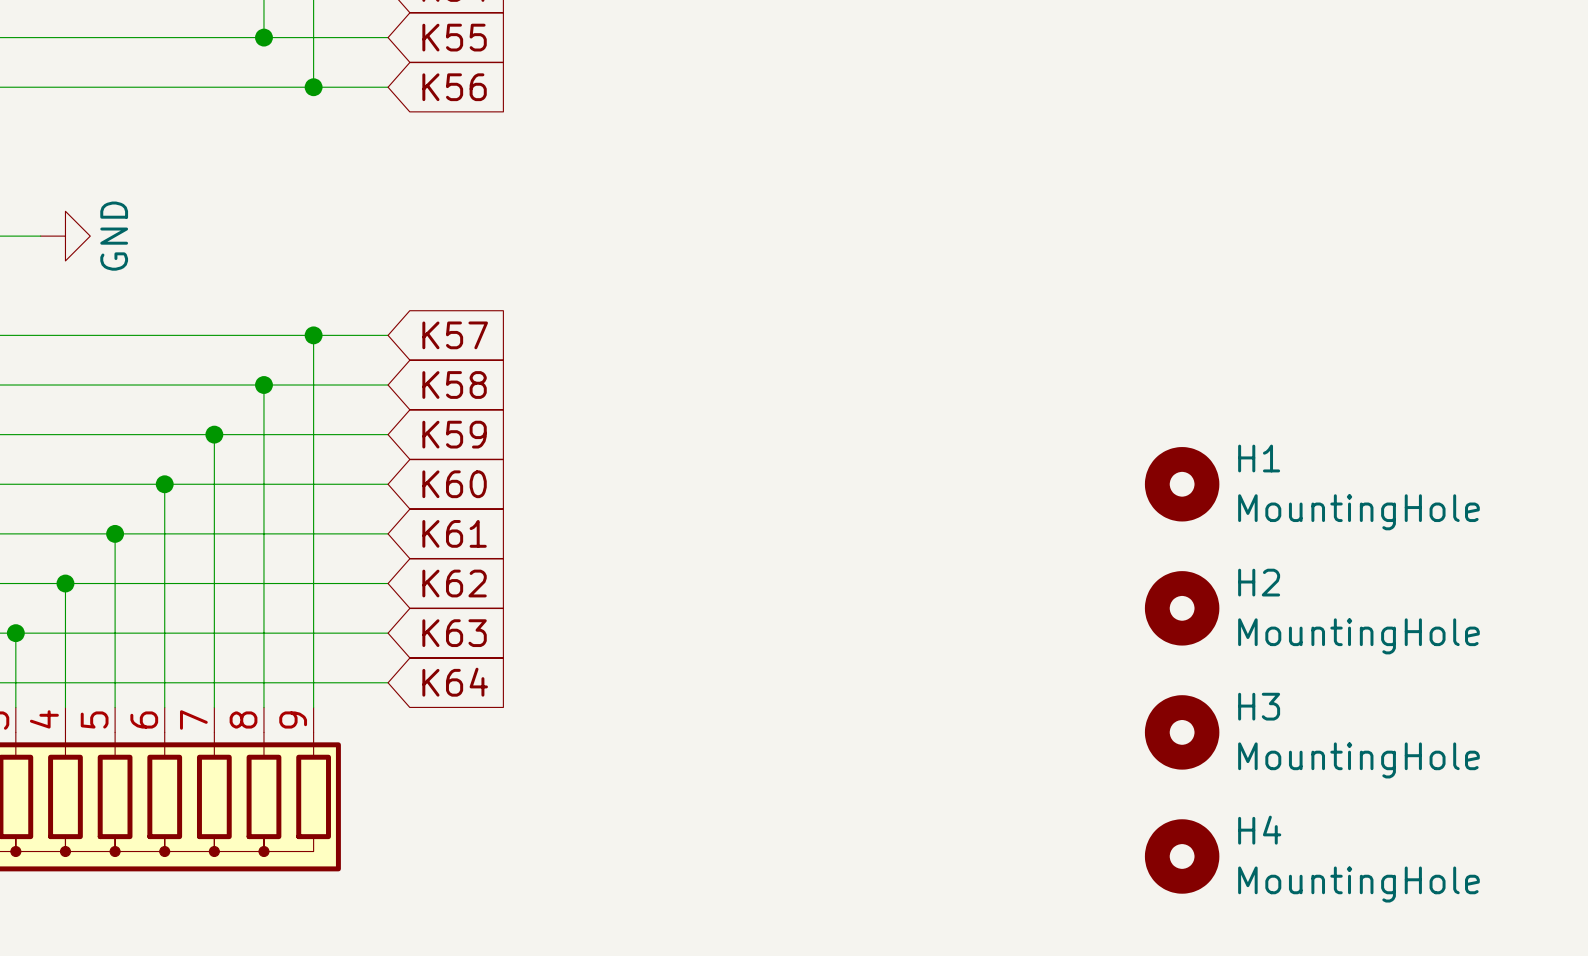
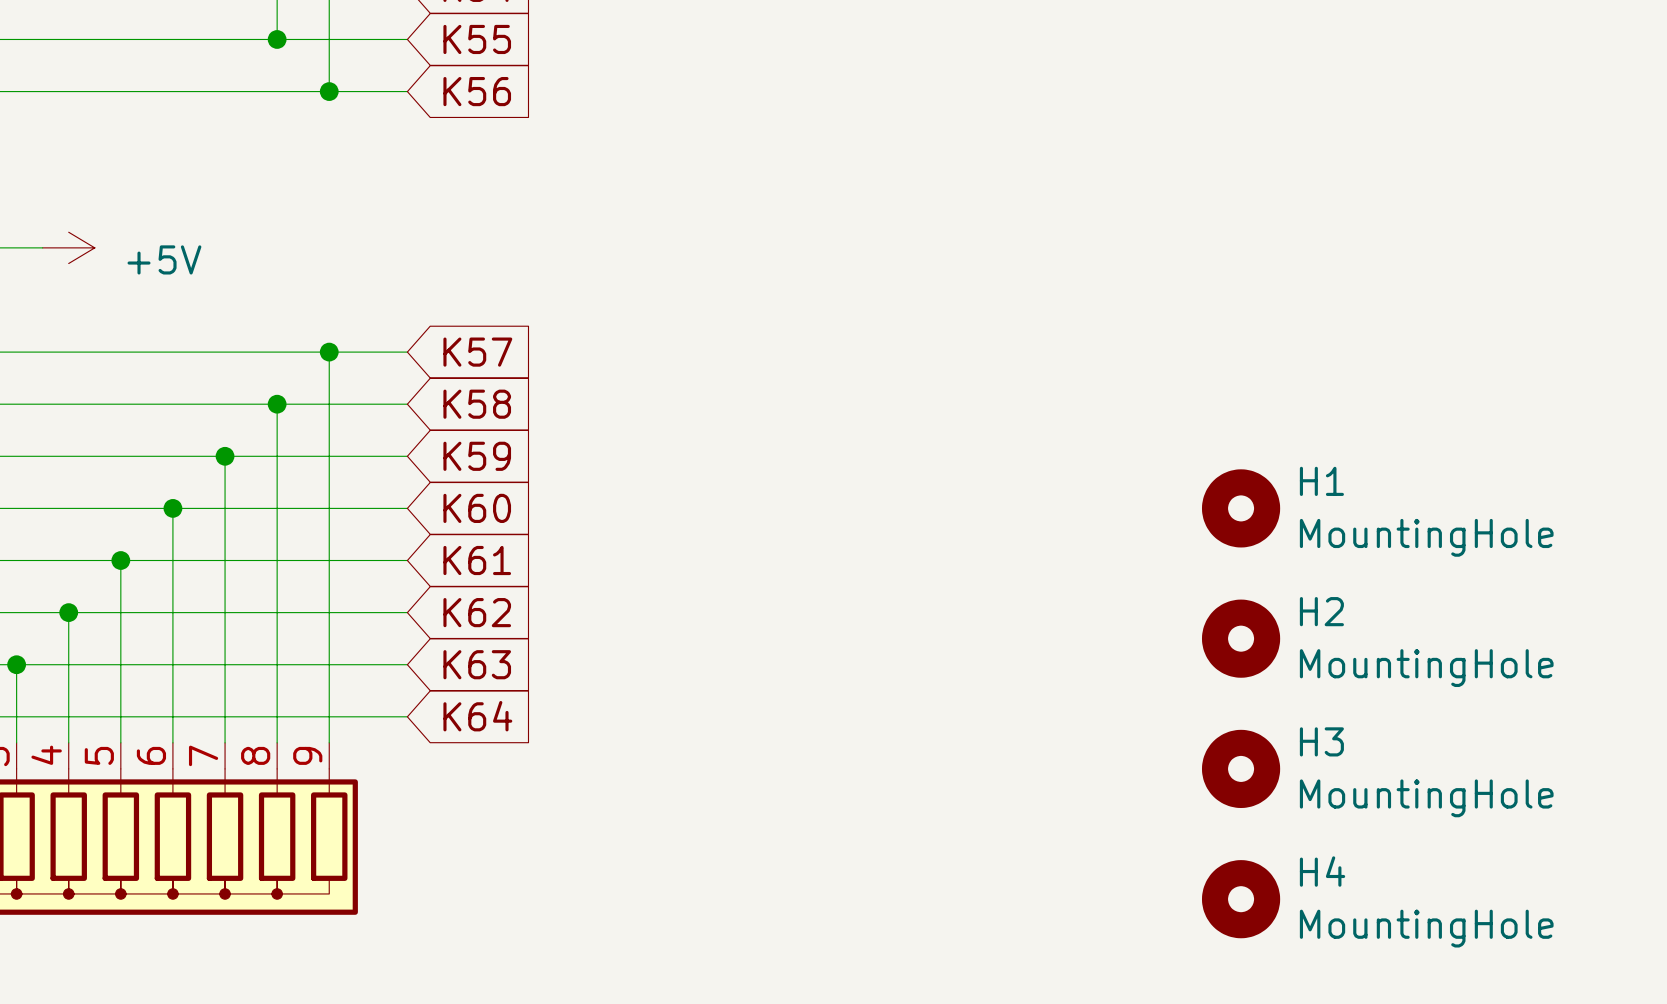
power symbol: GND (65, 236) -> +5V (68, 247)

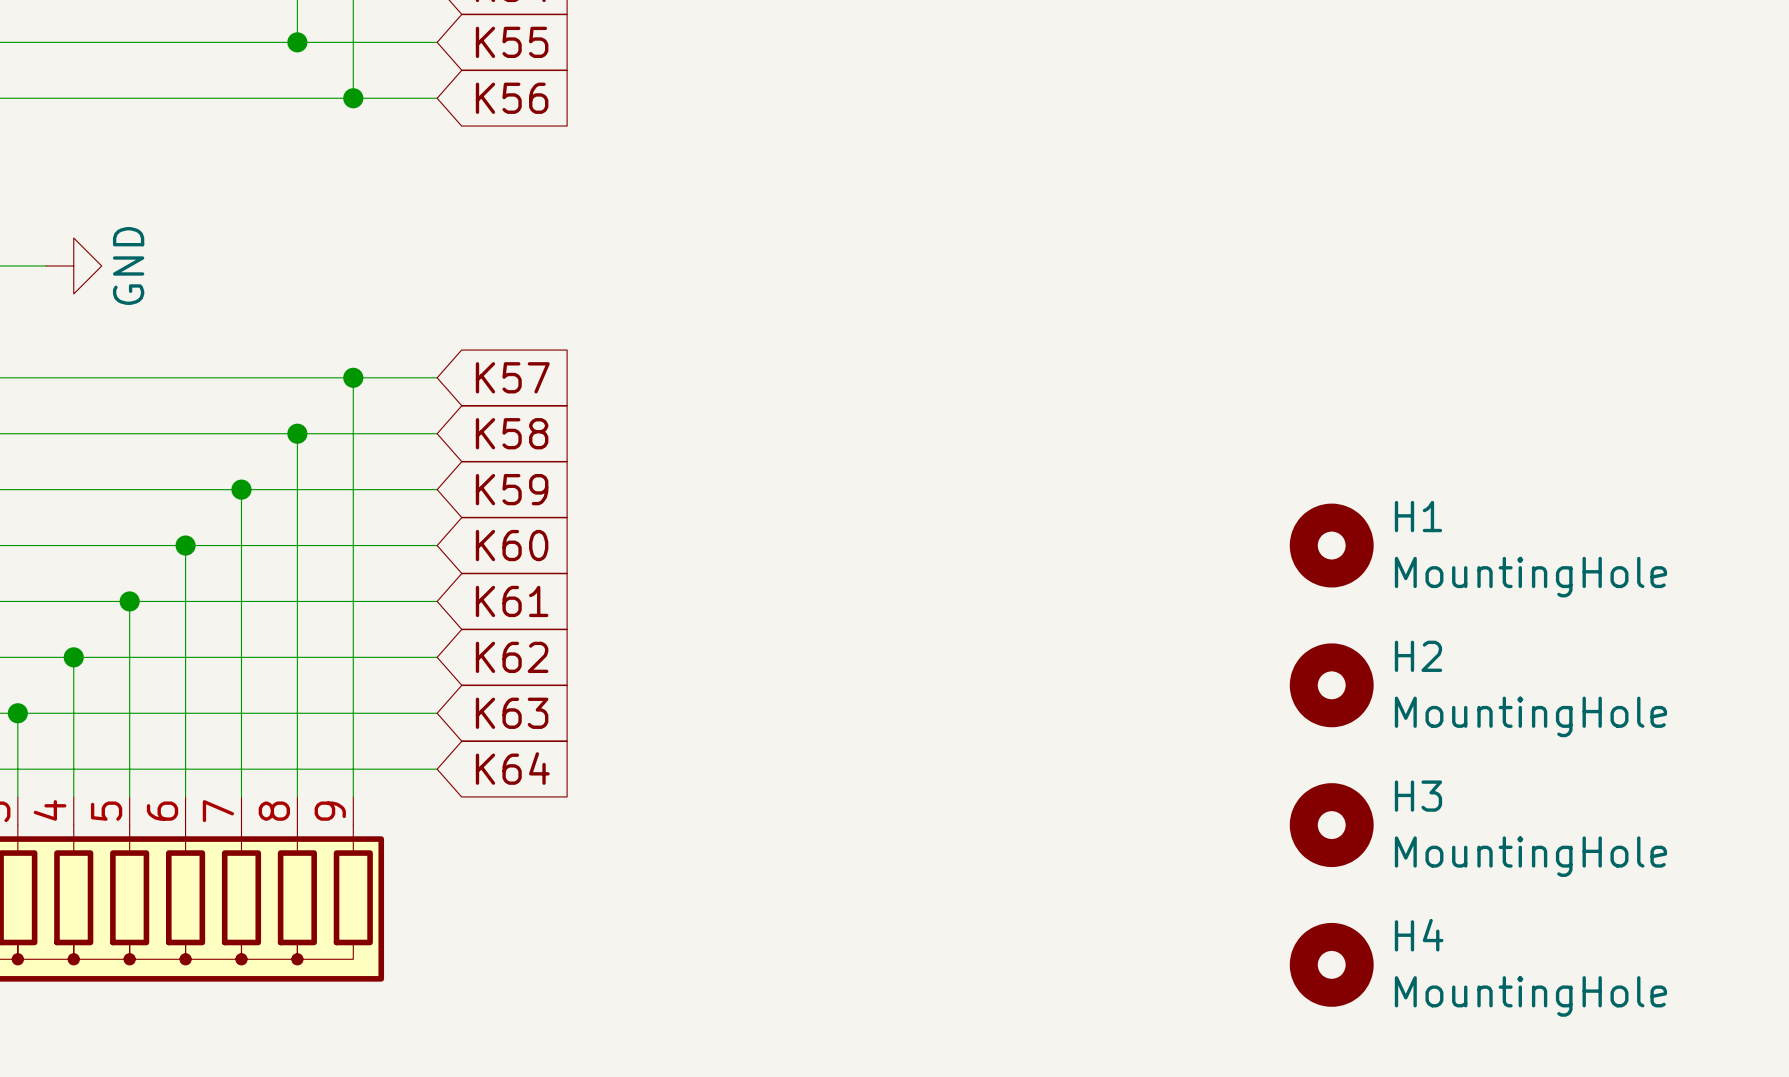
power symbol: +5V (68, 247) -> GND (73, 265)

